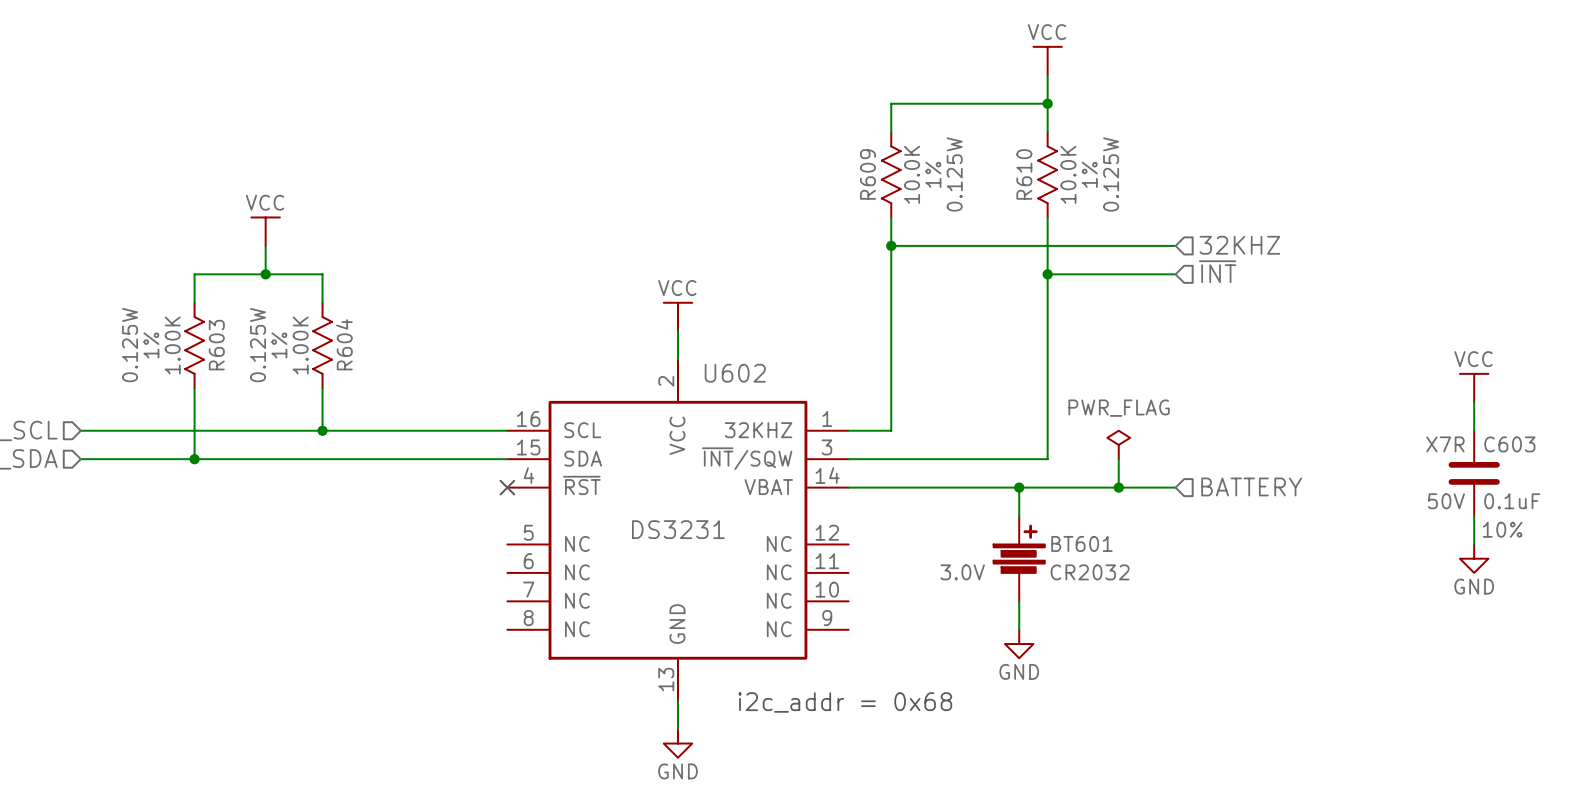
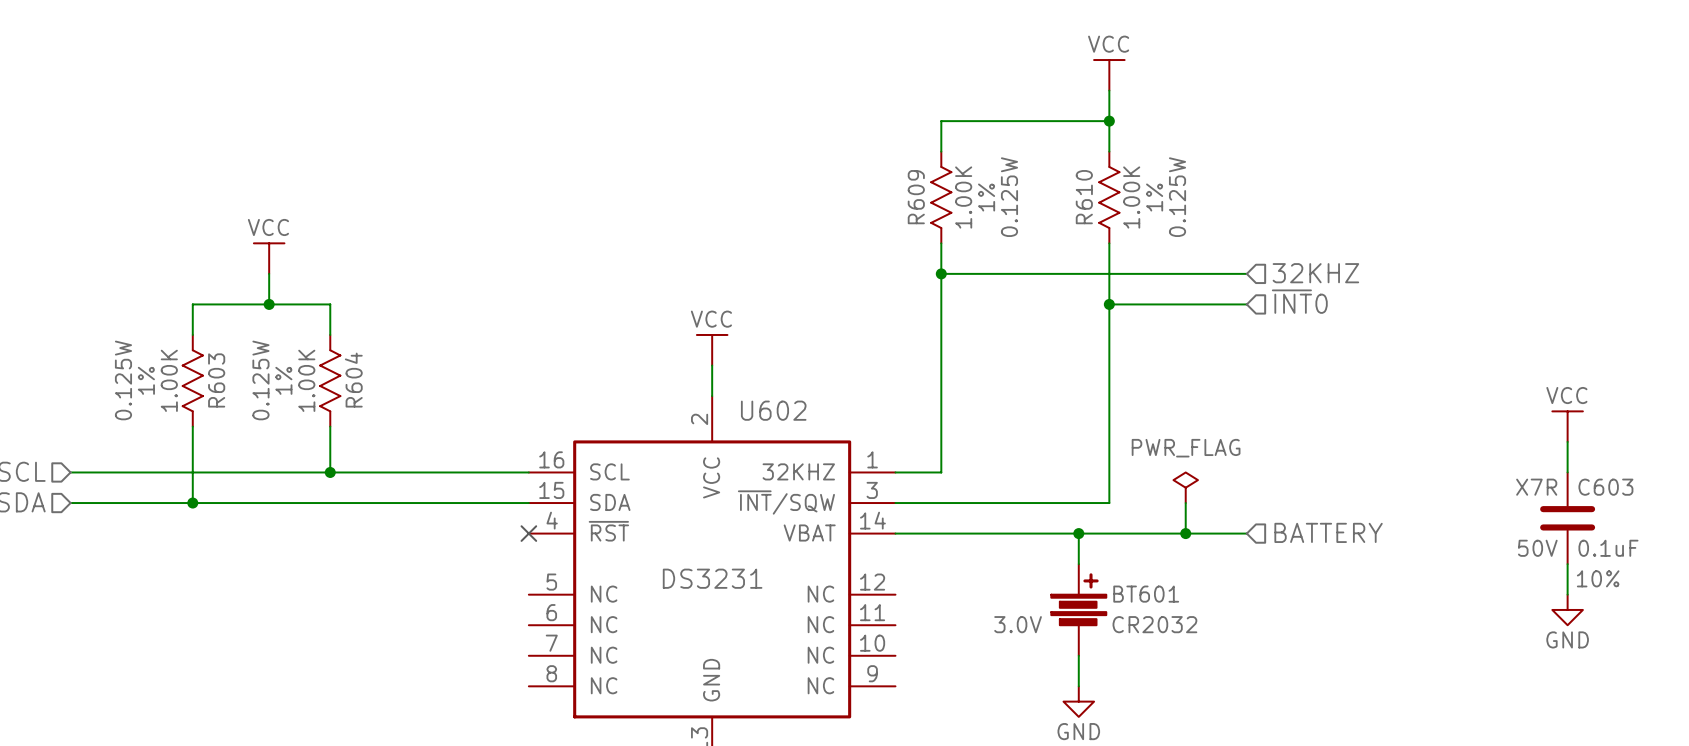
R609 value: 10.0K (912, 174) -> 1.00K (963, 197)
R610 value: 10.0K (1068, 174) -> 1.00K (1131, 197)
hierarchical label: ~{INT} (1217, 271) -> ~{INT}0 (1299, 301)

